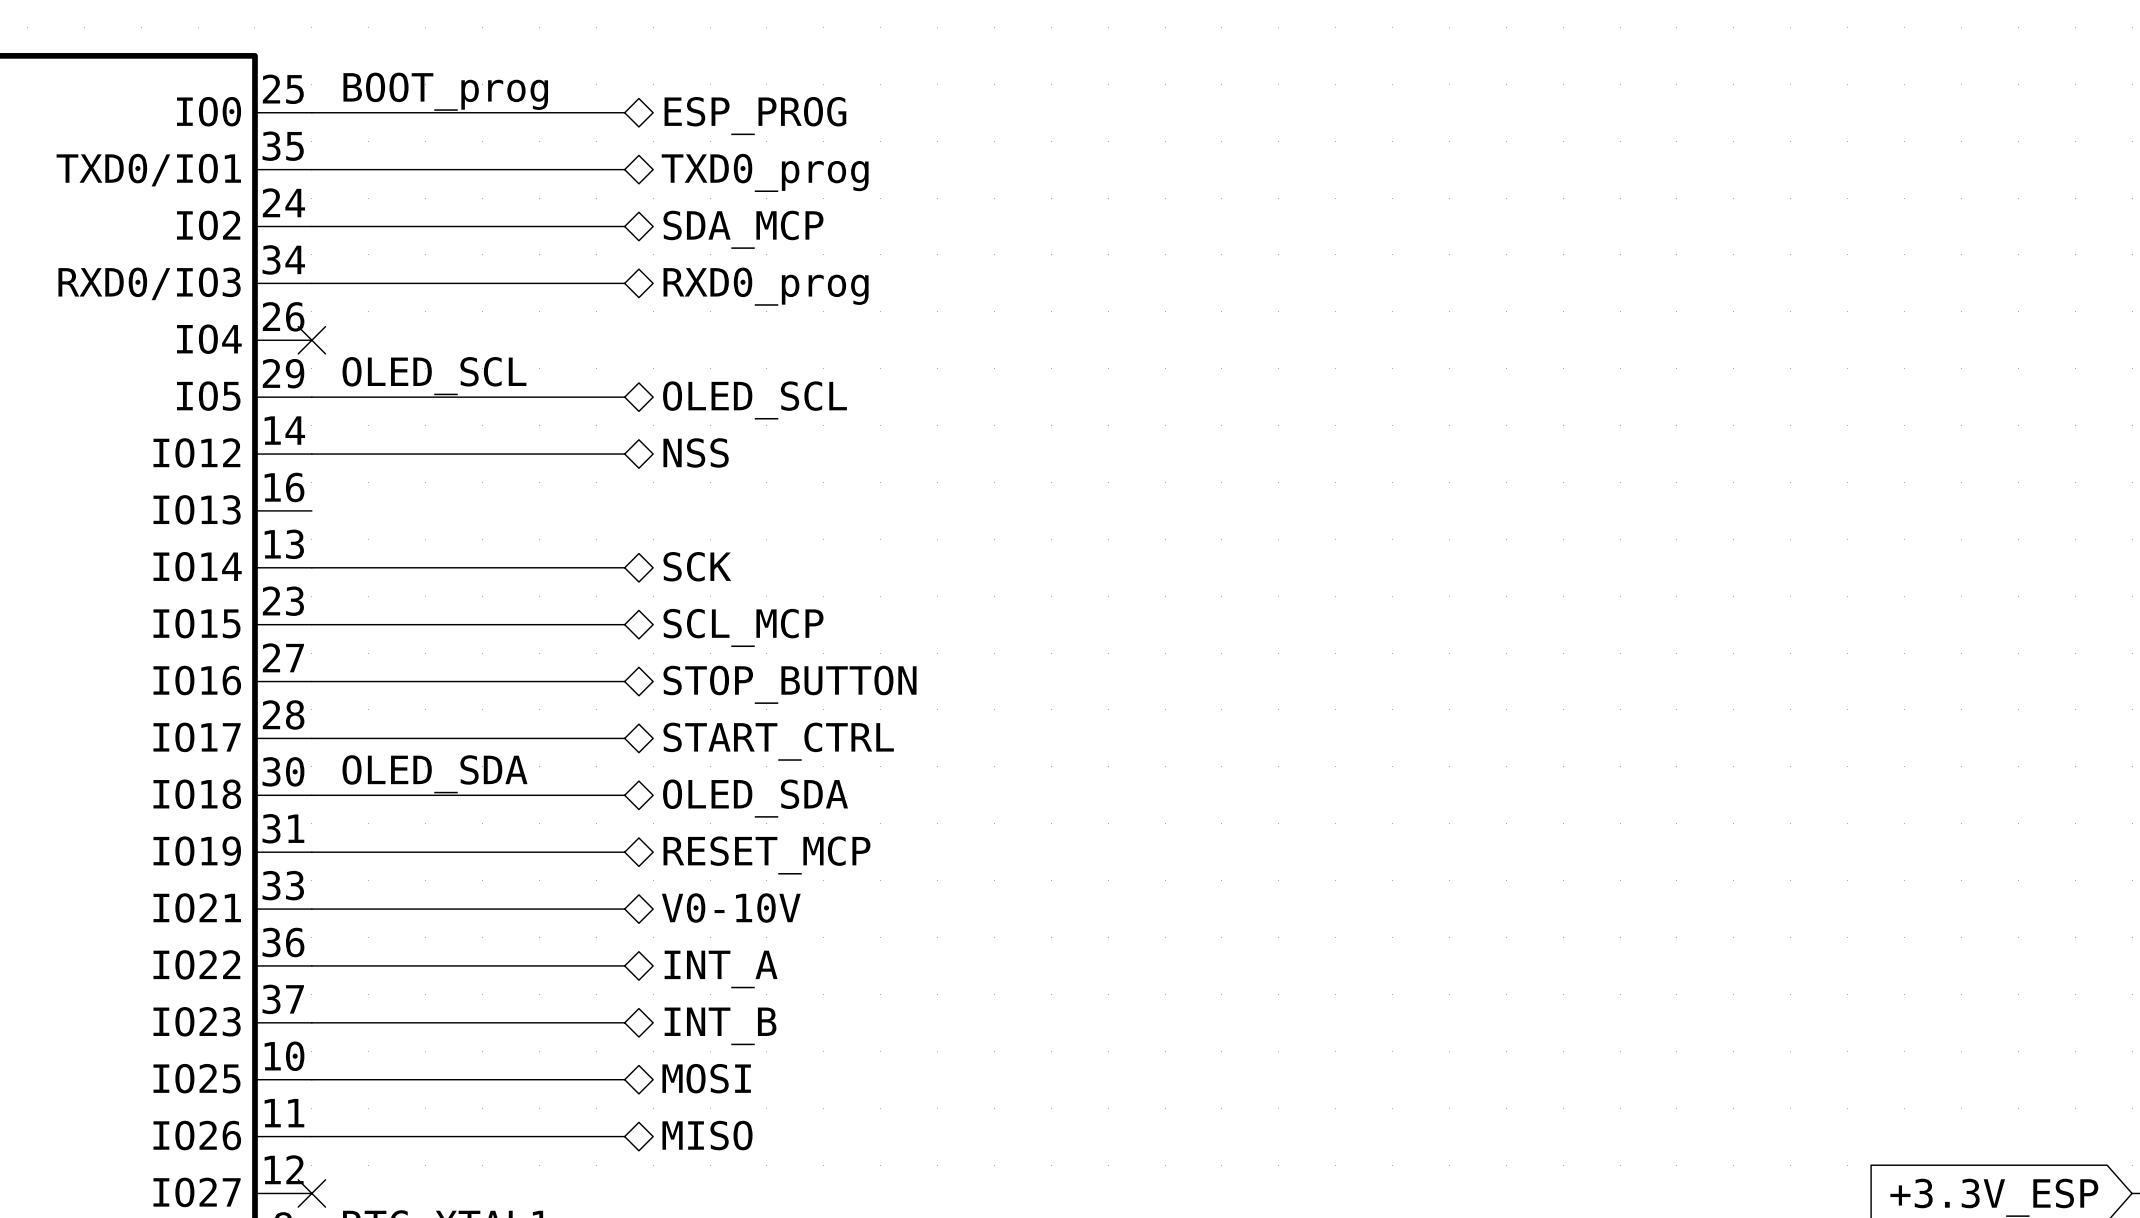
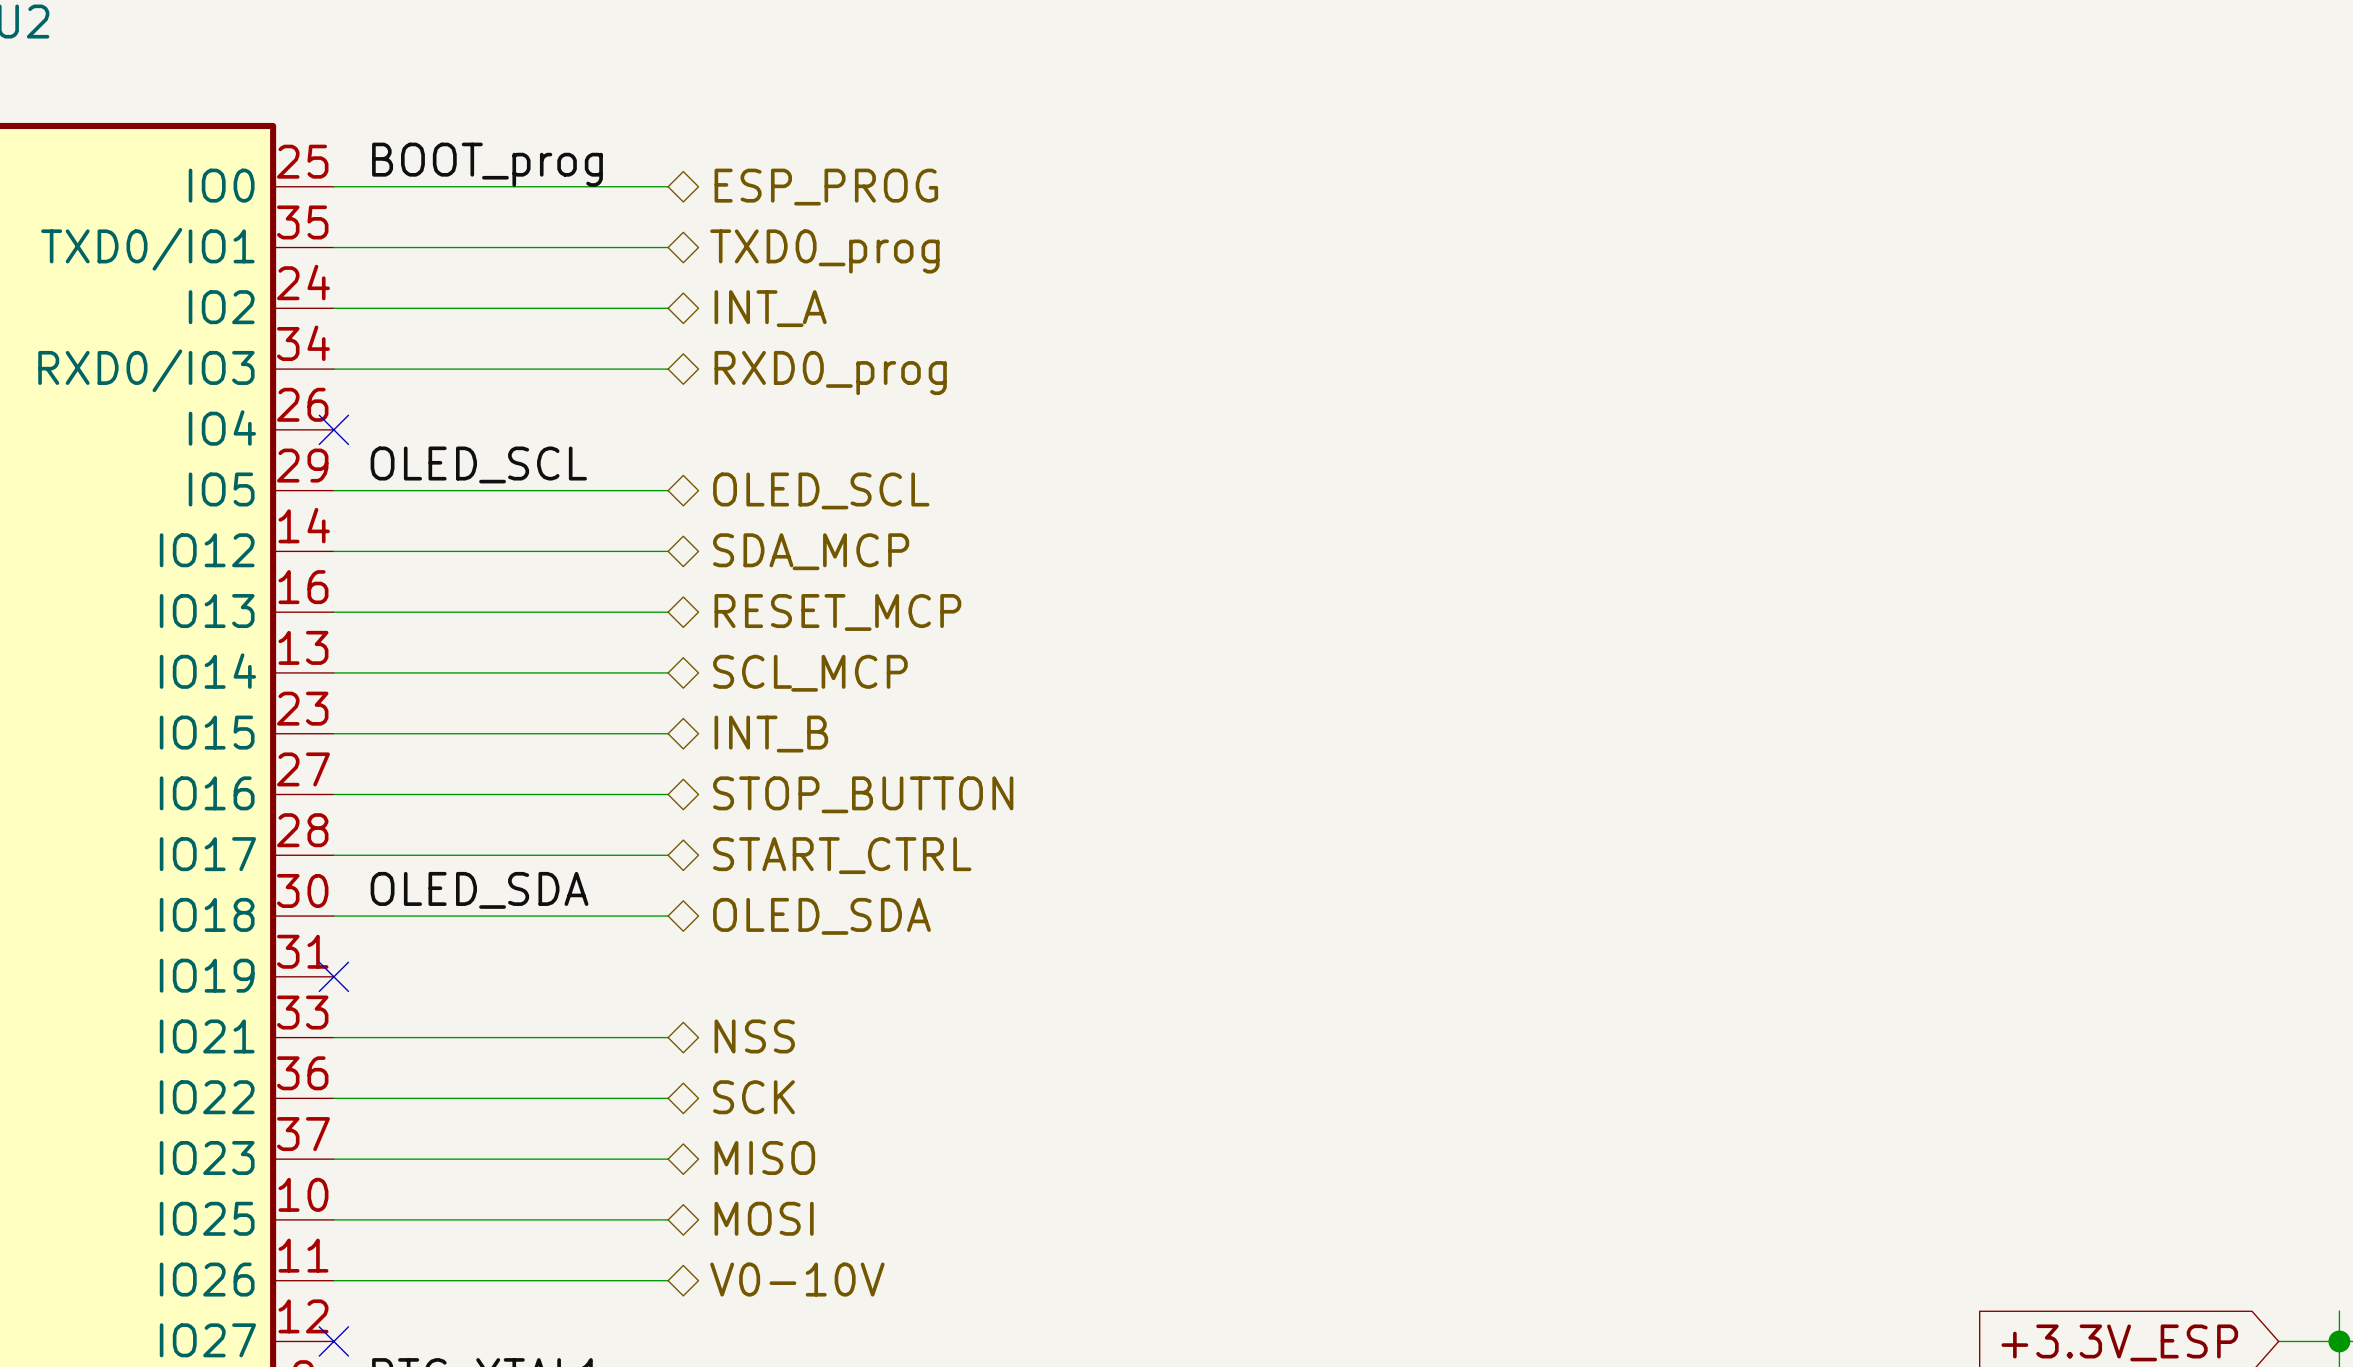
hierarchical label: SDA_MCP (743, 229) -> INT_A (770, 308)
hierarchical label: NSS (696, 452) -> SDA_MCP (811, 551)
hierarchical label: SCK (697, 566) -> SCL_MCP (810, 673)
hierarchical label: SCL_MCP (743, 627) -> INT_B (771, 734)
wire: (311, 852) (624, 852) -> (333, 612) (668, 612)
no-connect mark: none -> (333, 976)
hierarchical label position: RESET_MCP (767, 855) -> RESET_MCP (837, 612)
hierarchical label: V0-10V (731, 908) -> NSS (754, 1036)
hierarchical label: INT_A (721, 969) -> SCK (753, 1097)
hierarchical label: INT_B (720, 1026) -> MISO (764, 1158)
hierarchical label: MISO (707, 1135) -> V0-10V (797, 1279)

